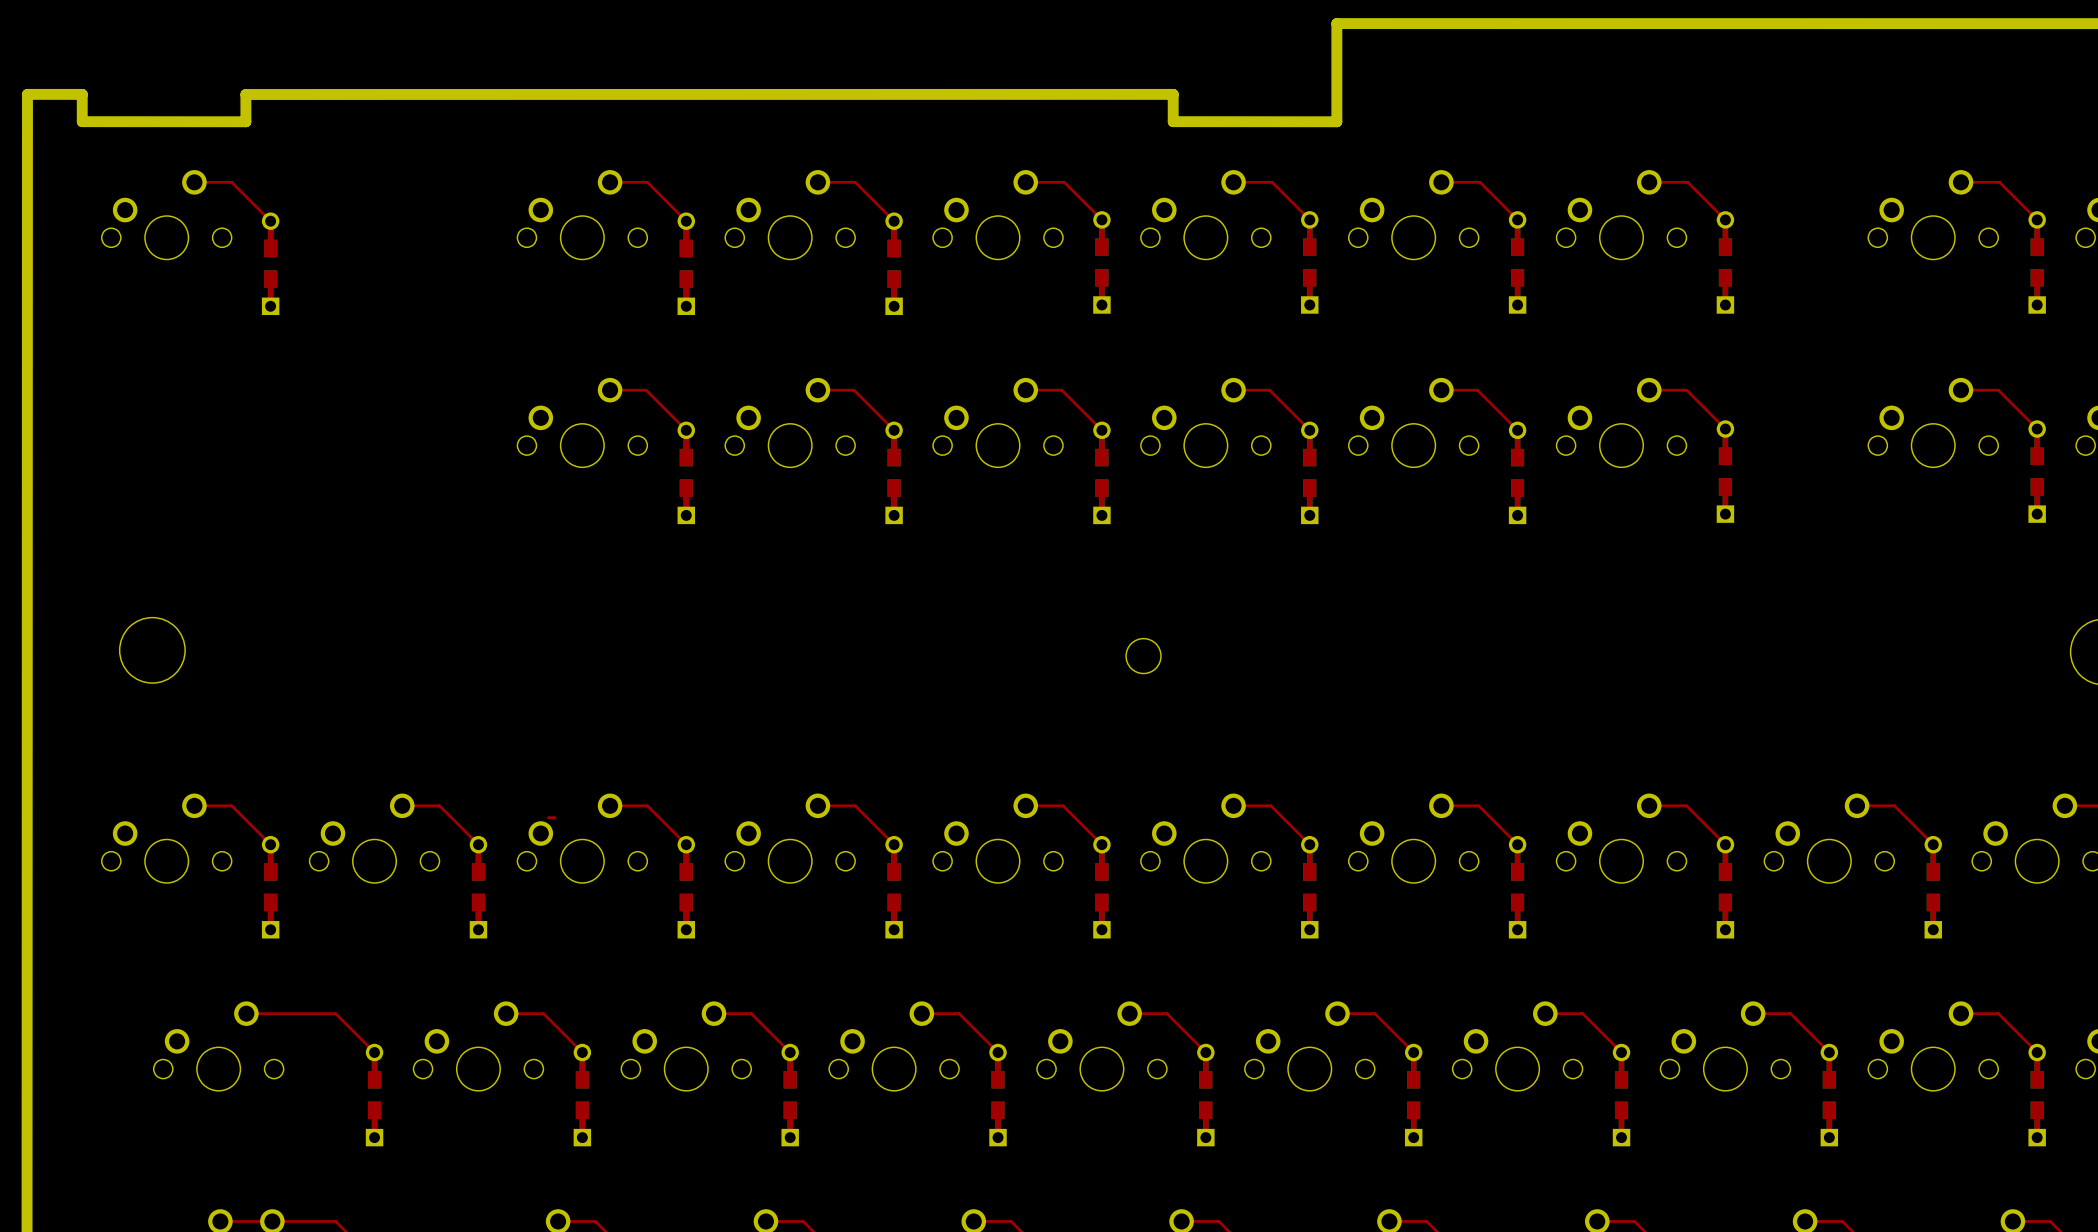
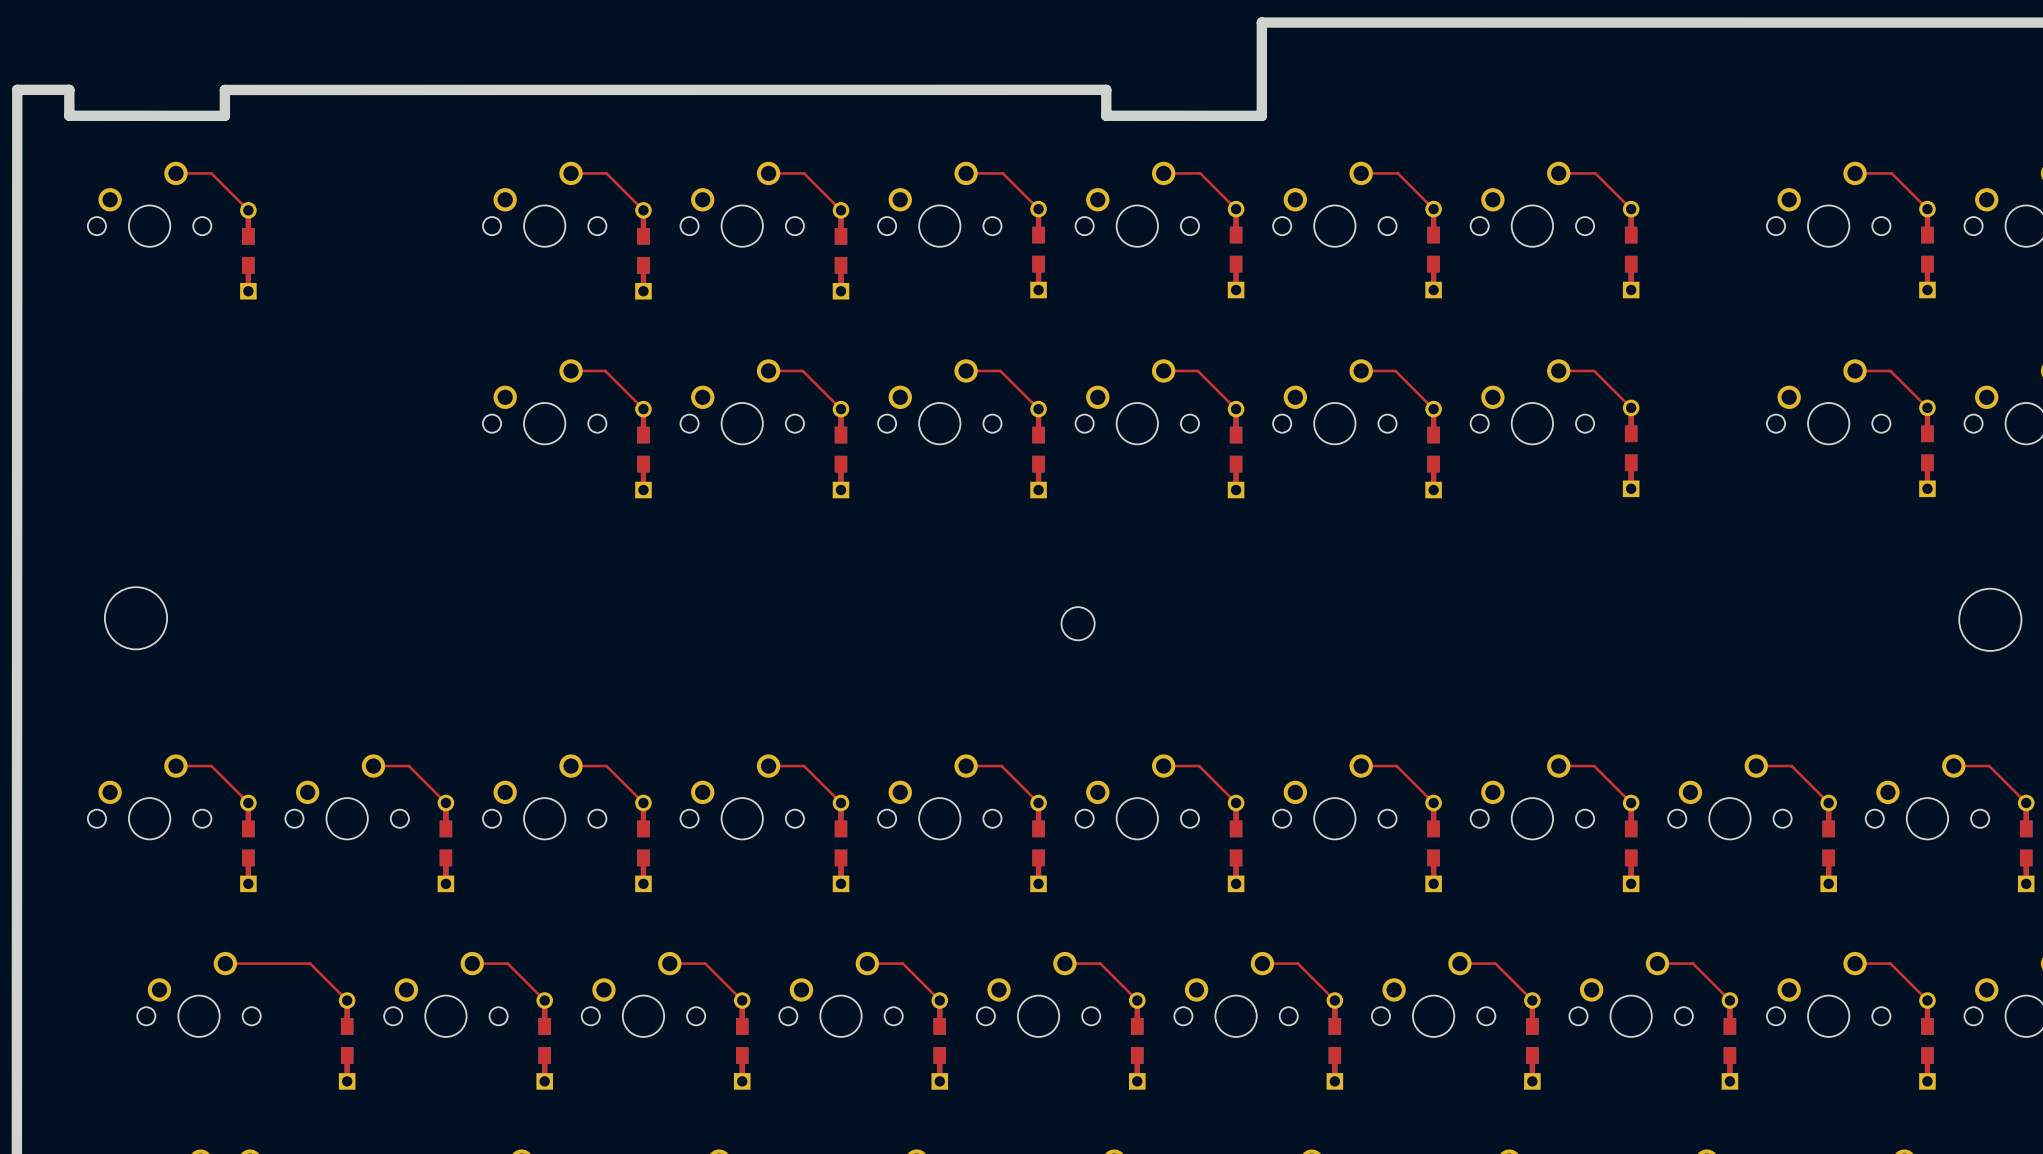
top track: (548, 817) (554, 818) -> none

